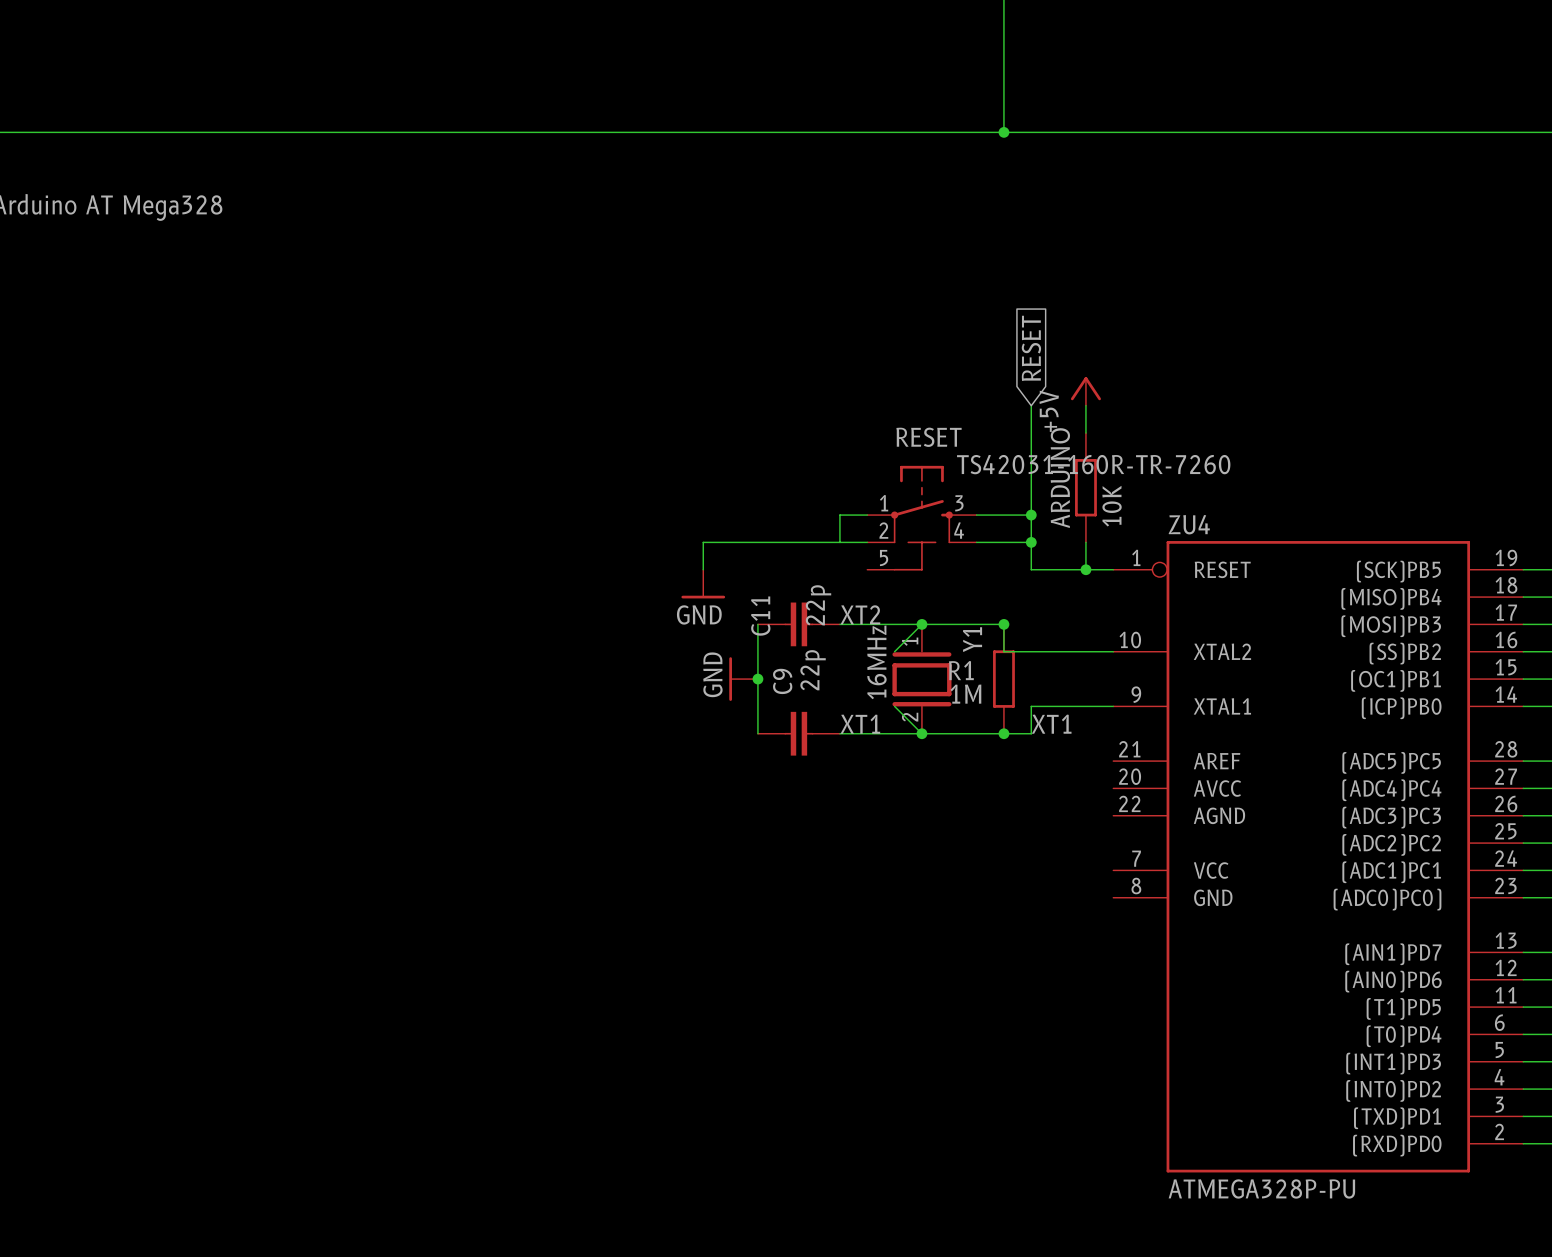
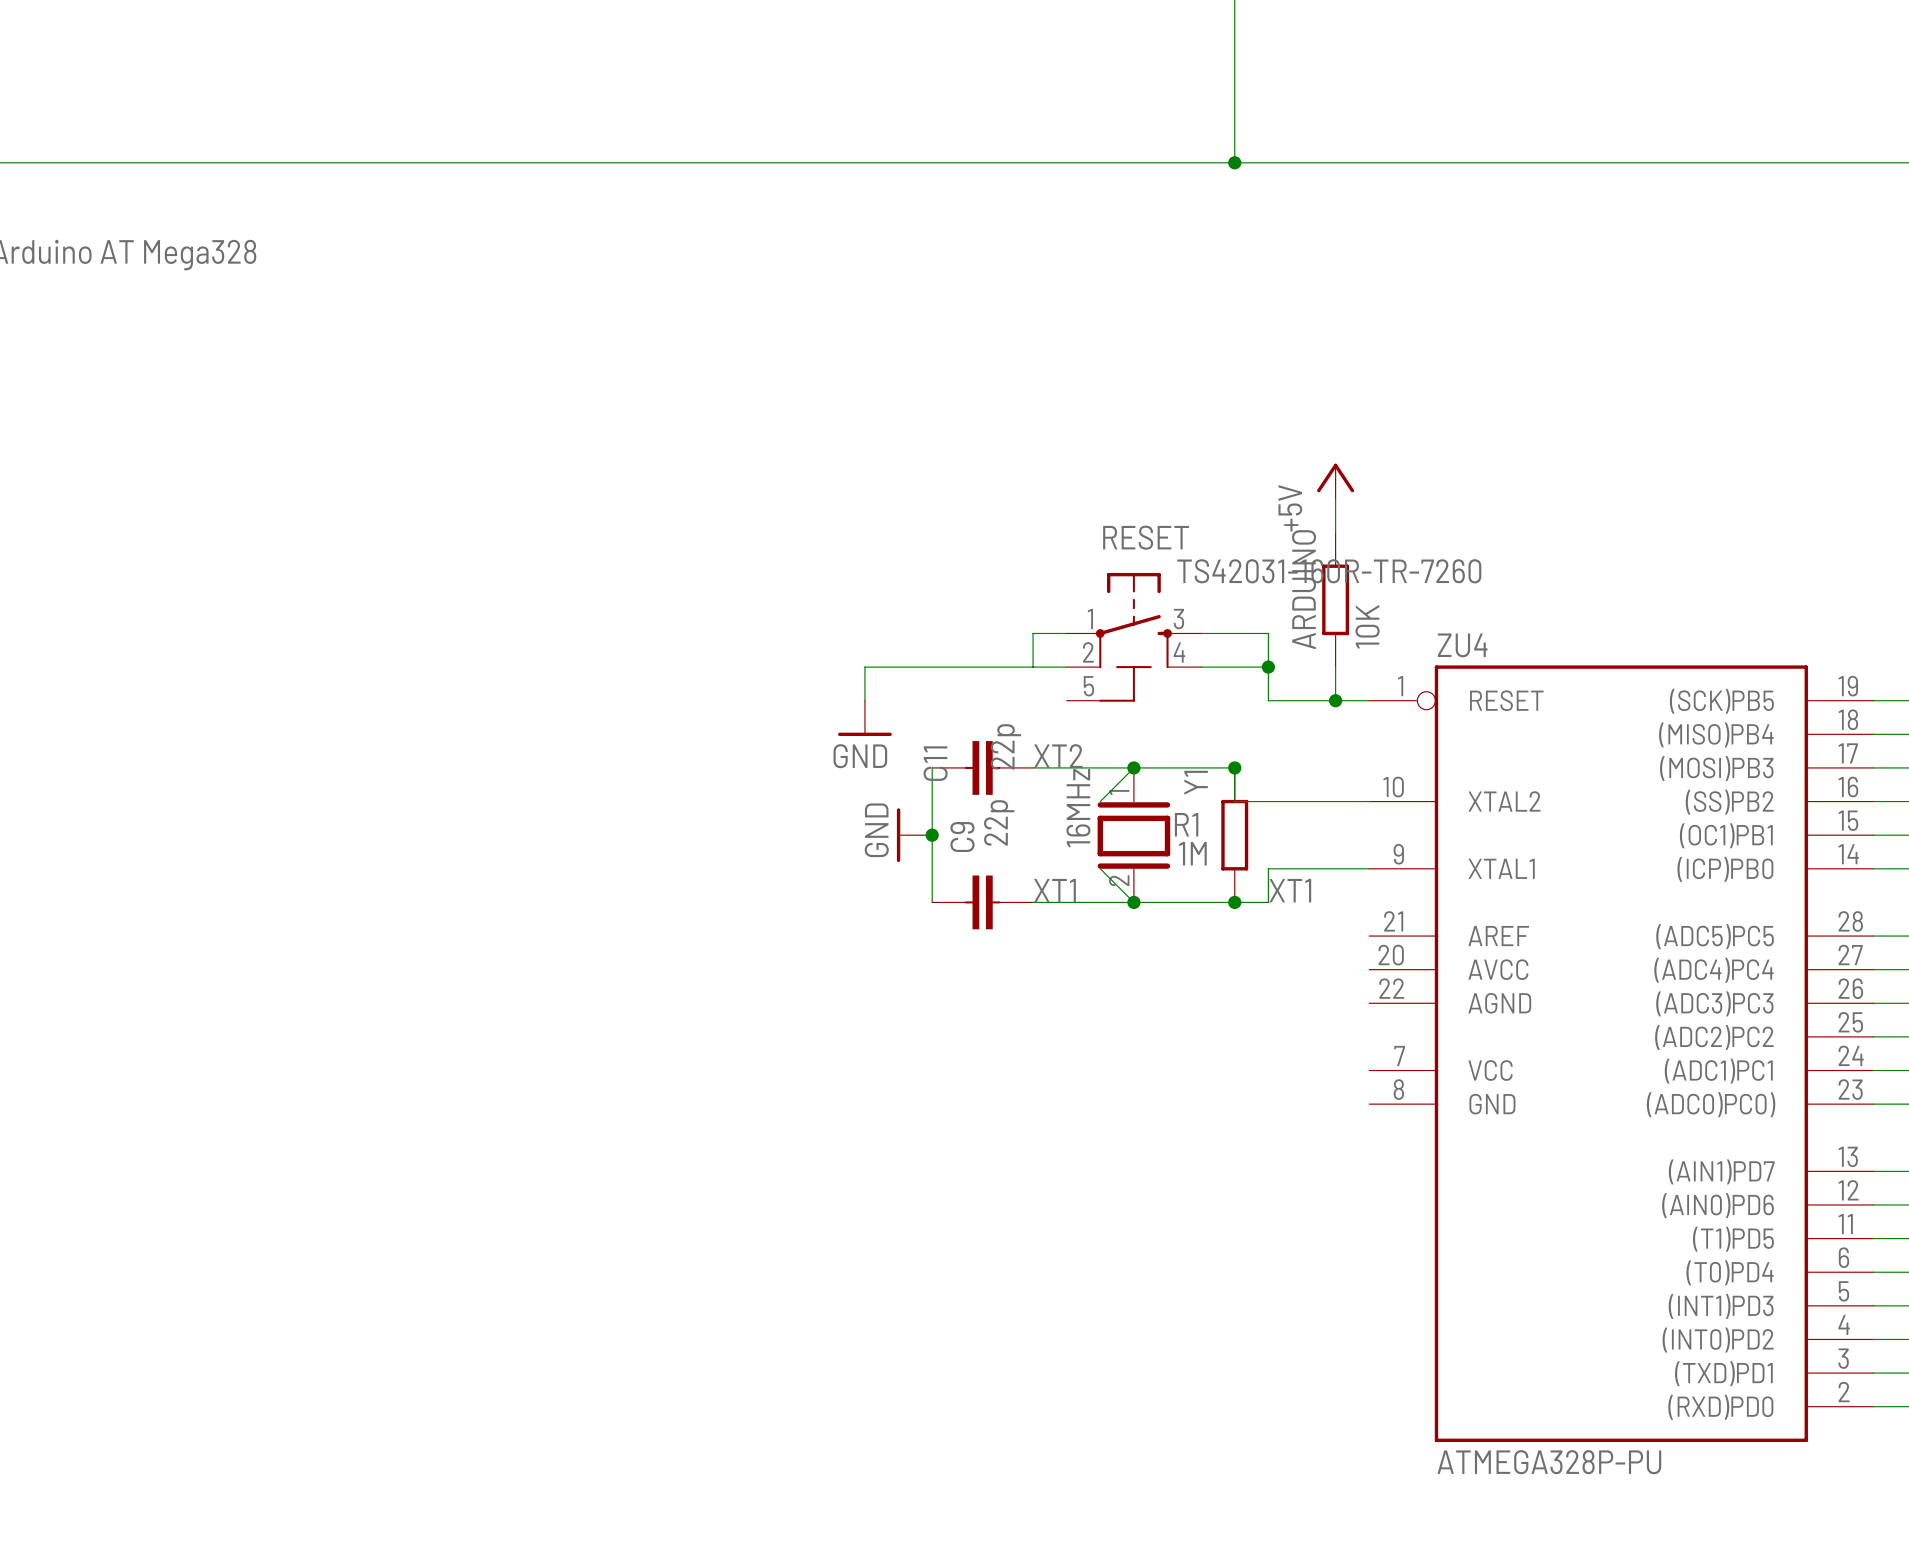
global label: RESET (1031, 348) -> none
wire: (1031, 405) (1031, 515) -> none
junction: (1031, 515) -> none

